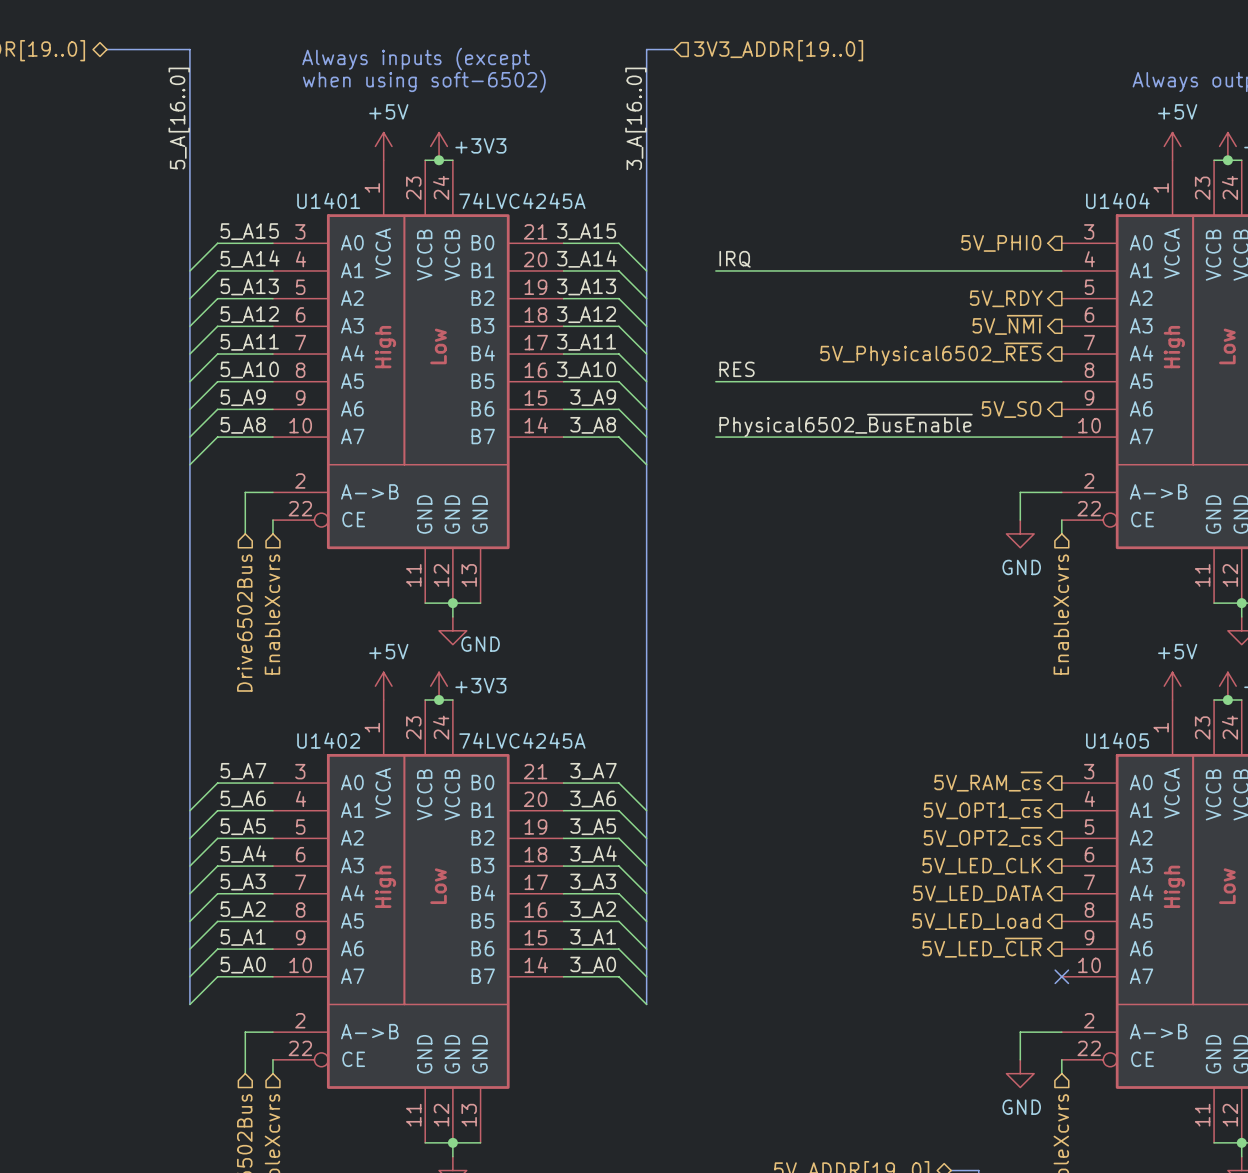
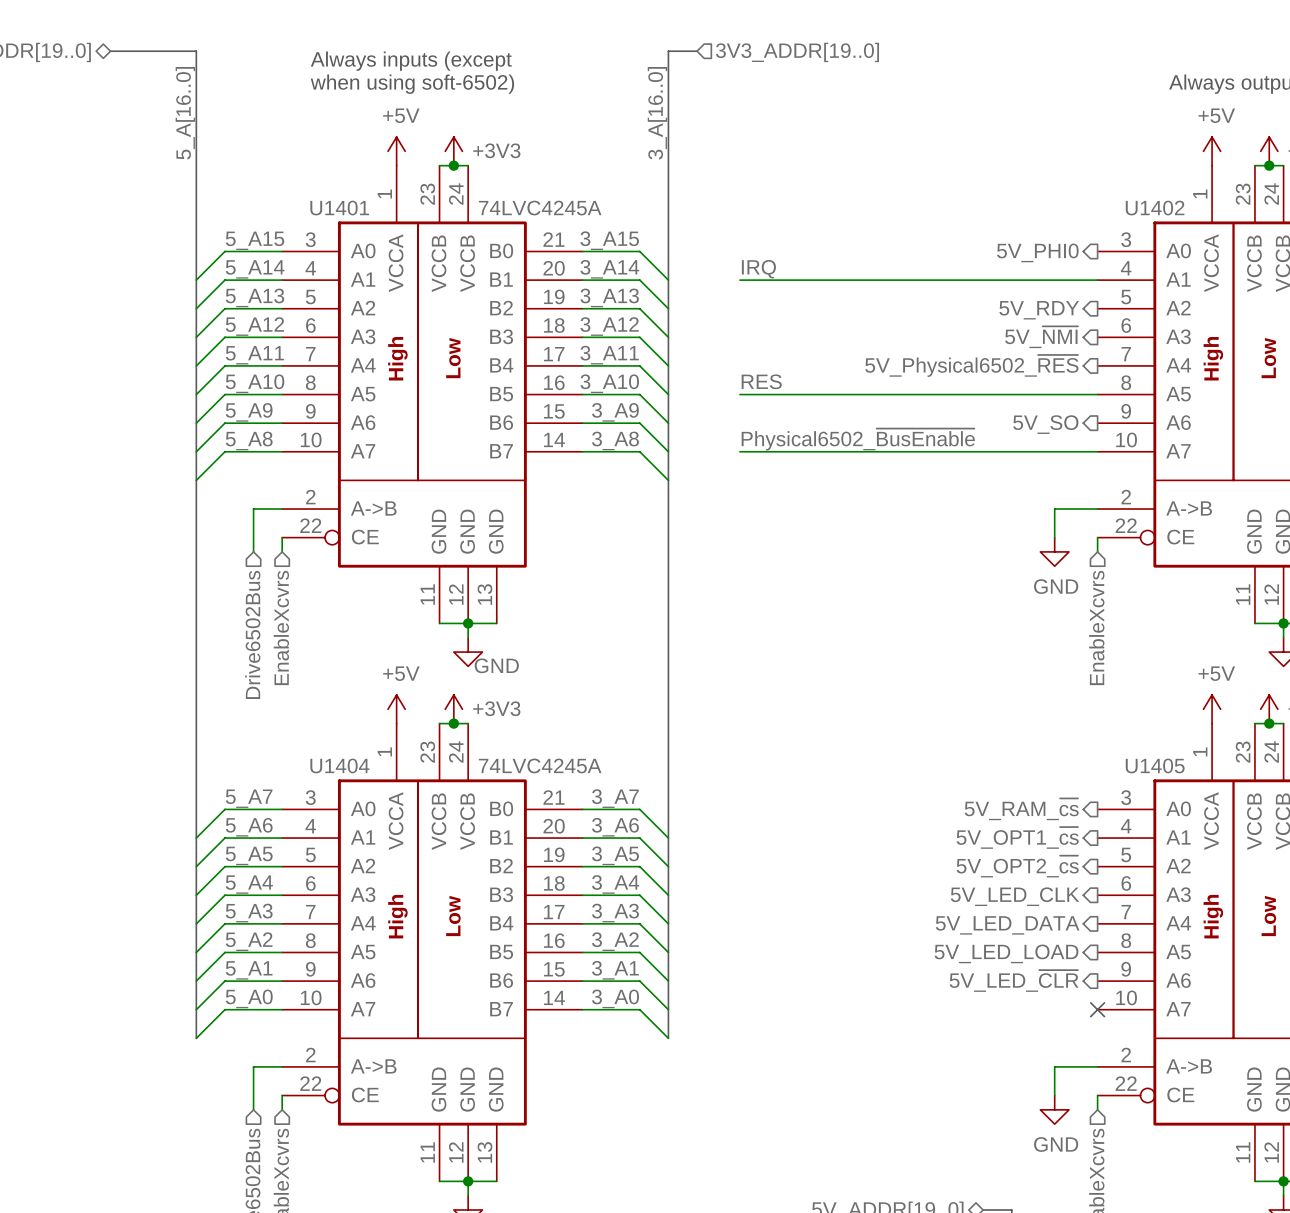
U1404 name: U1404 (1117, 200) -> U1402 (1155, 208)
U1402 name: U1402 (328, 740) -> U1404 (339, 765)
hierarchical label: 5V_LED_Load (976, 921) -> 5V_LED_LOAD (1006, 953)

